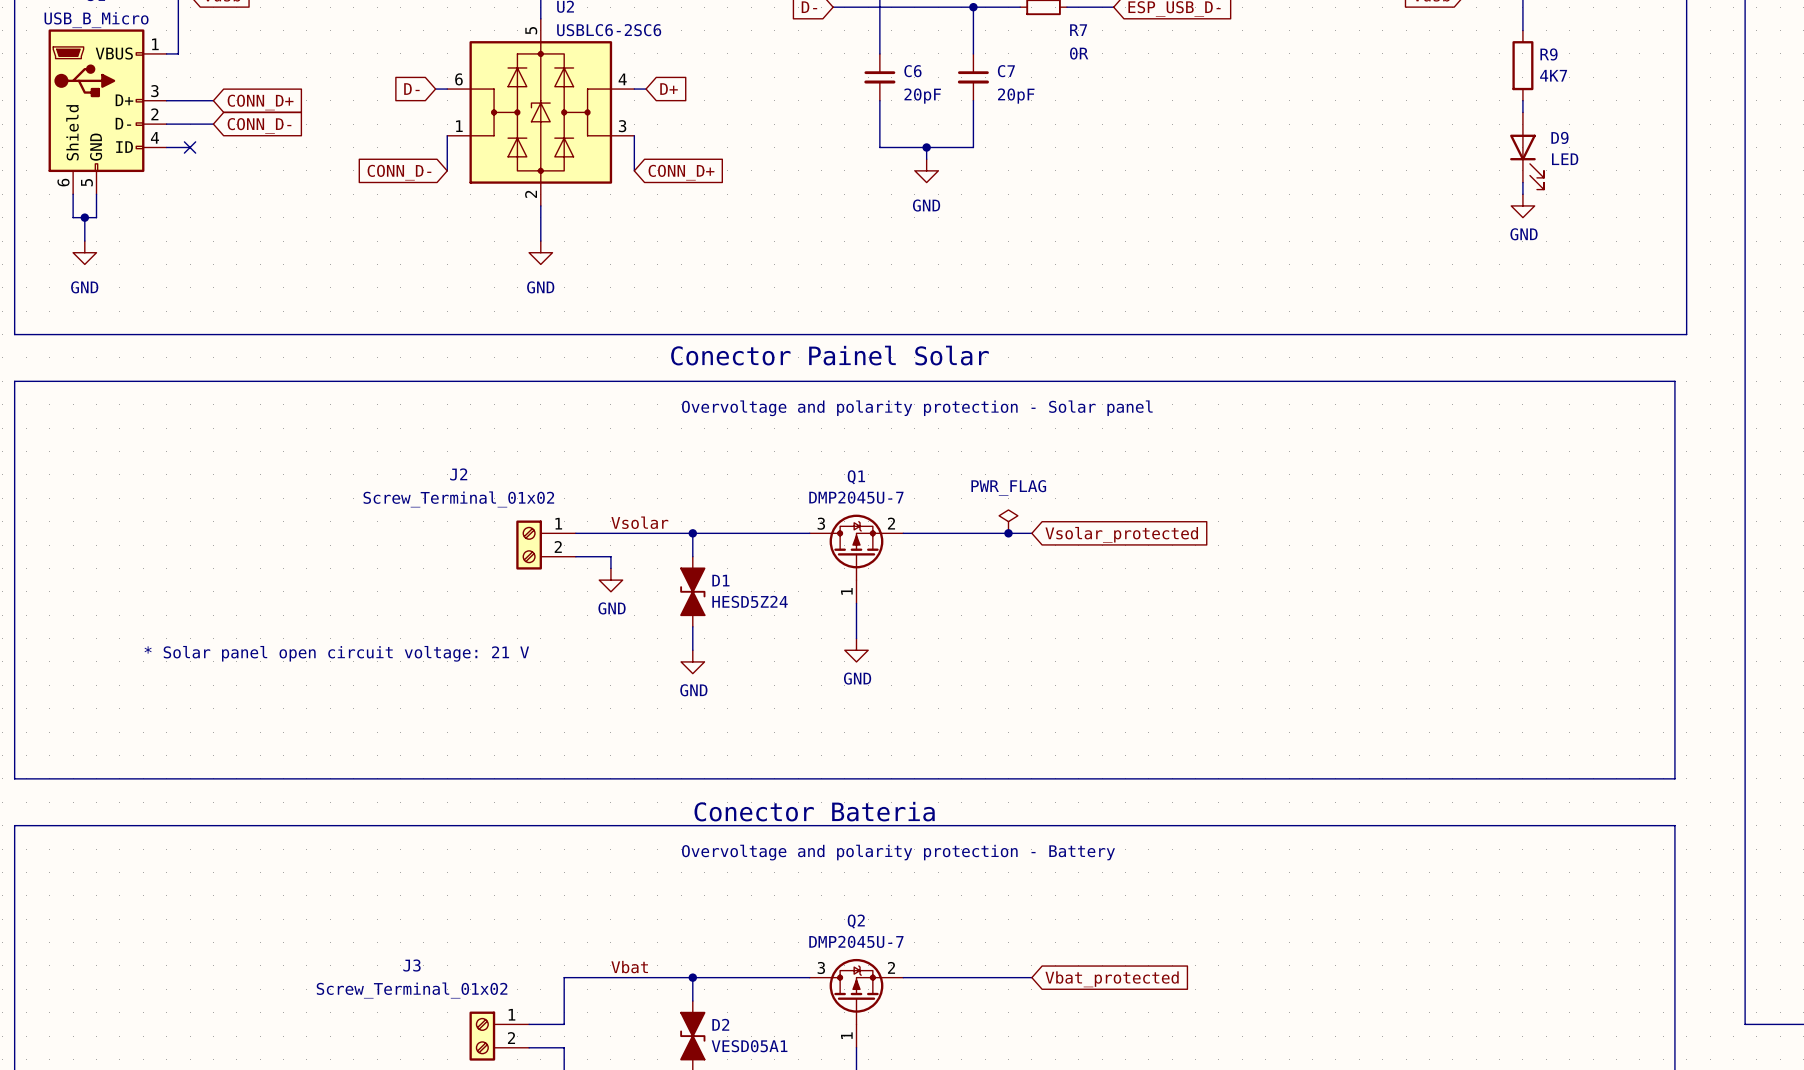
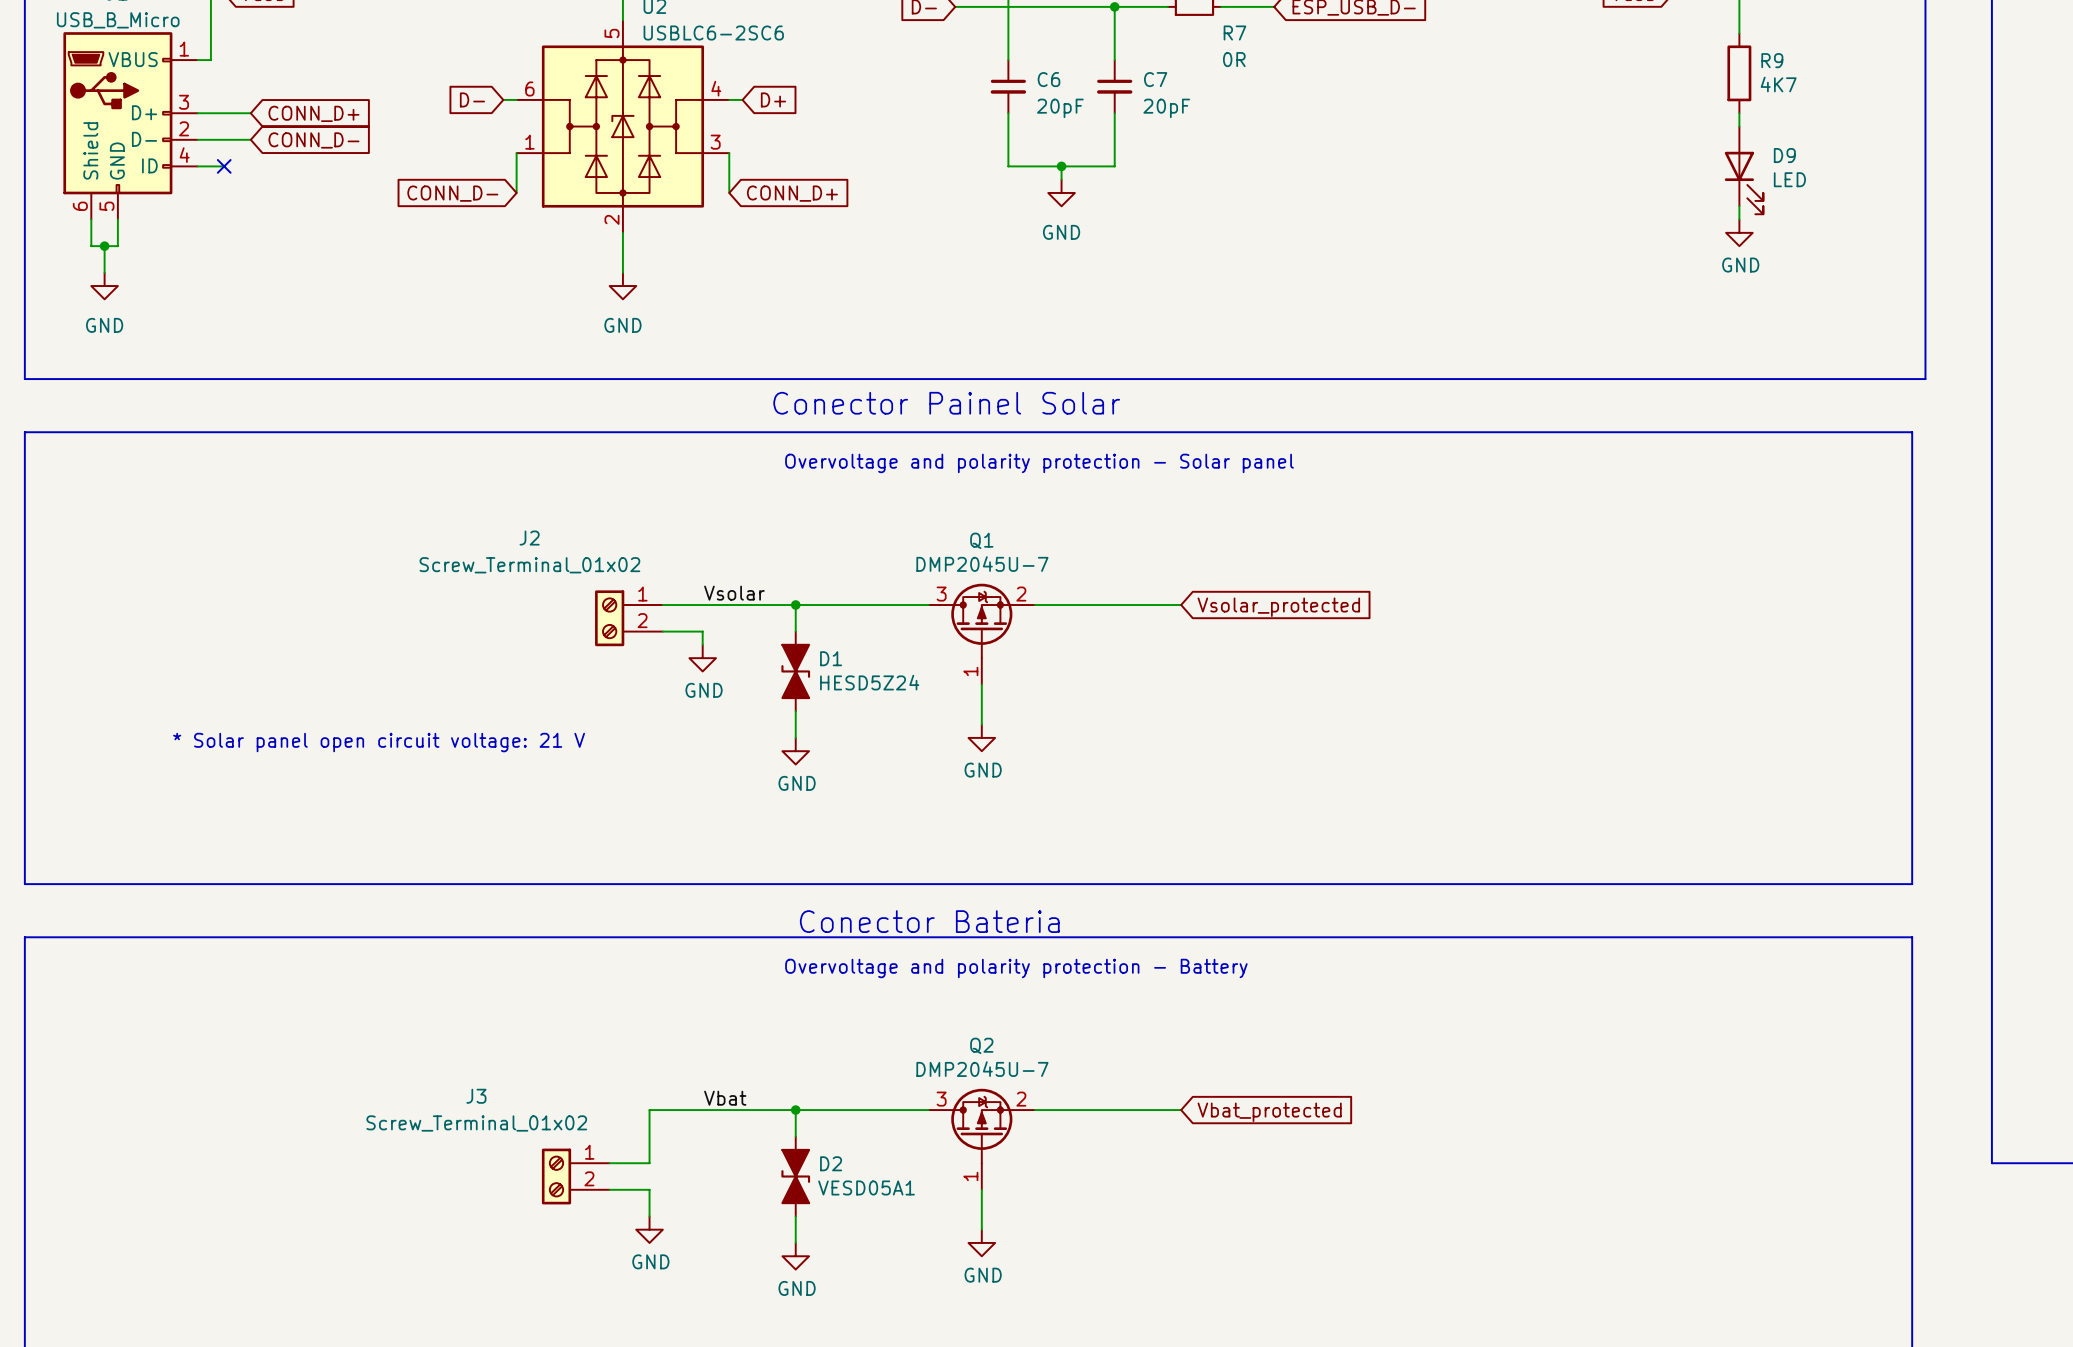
power symbol: PWR_FLAG (1008, 521) -> none
junction: (1008, 533) -> none

